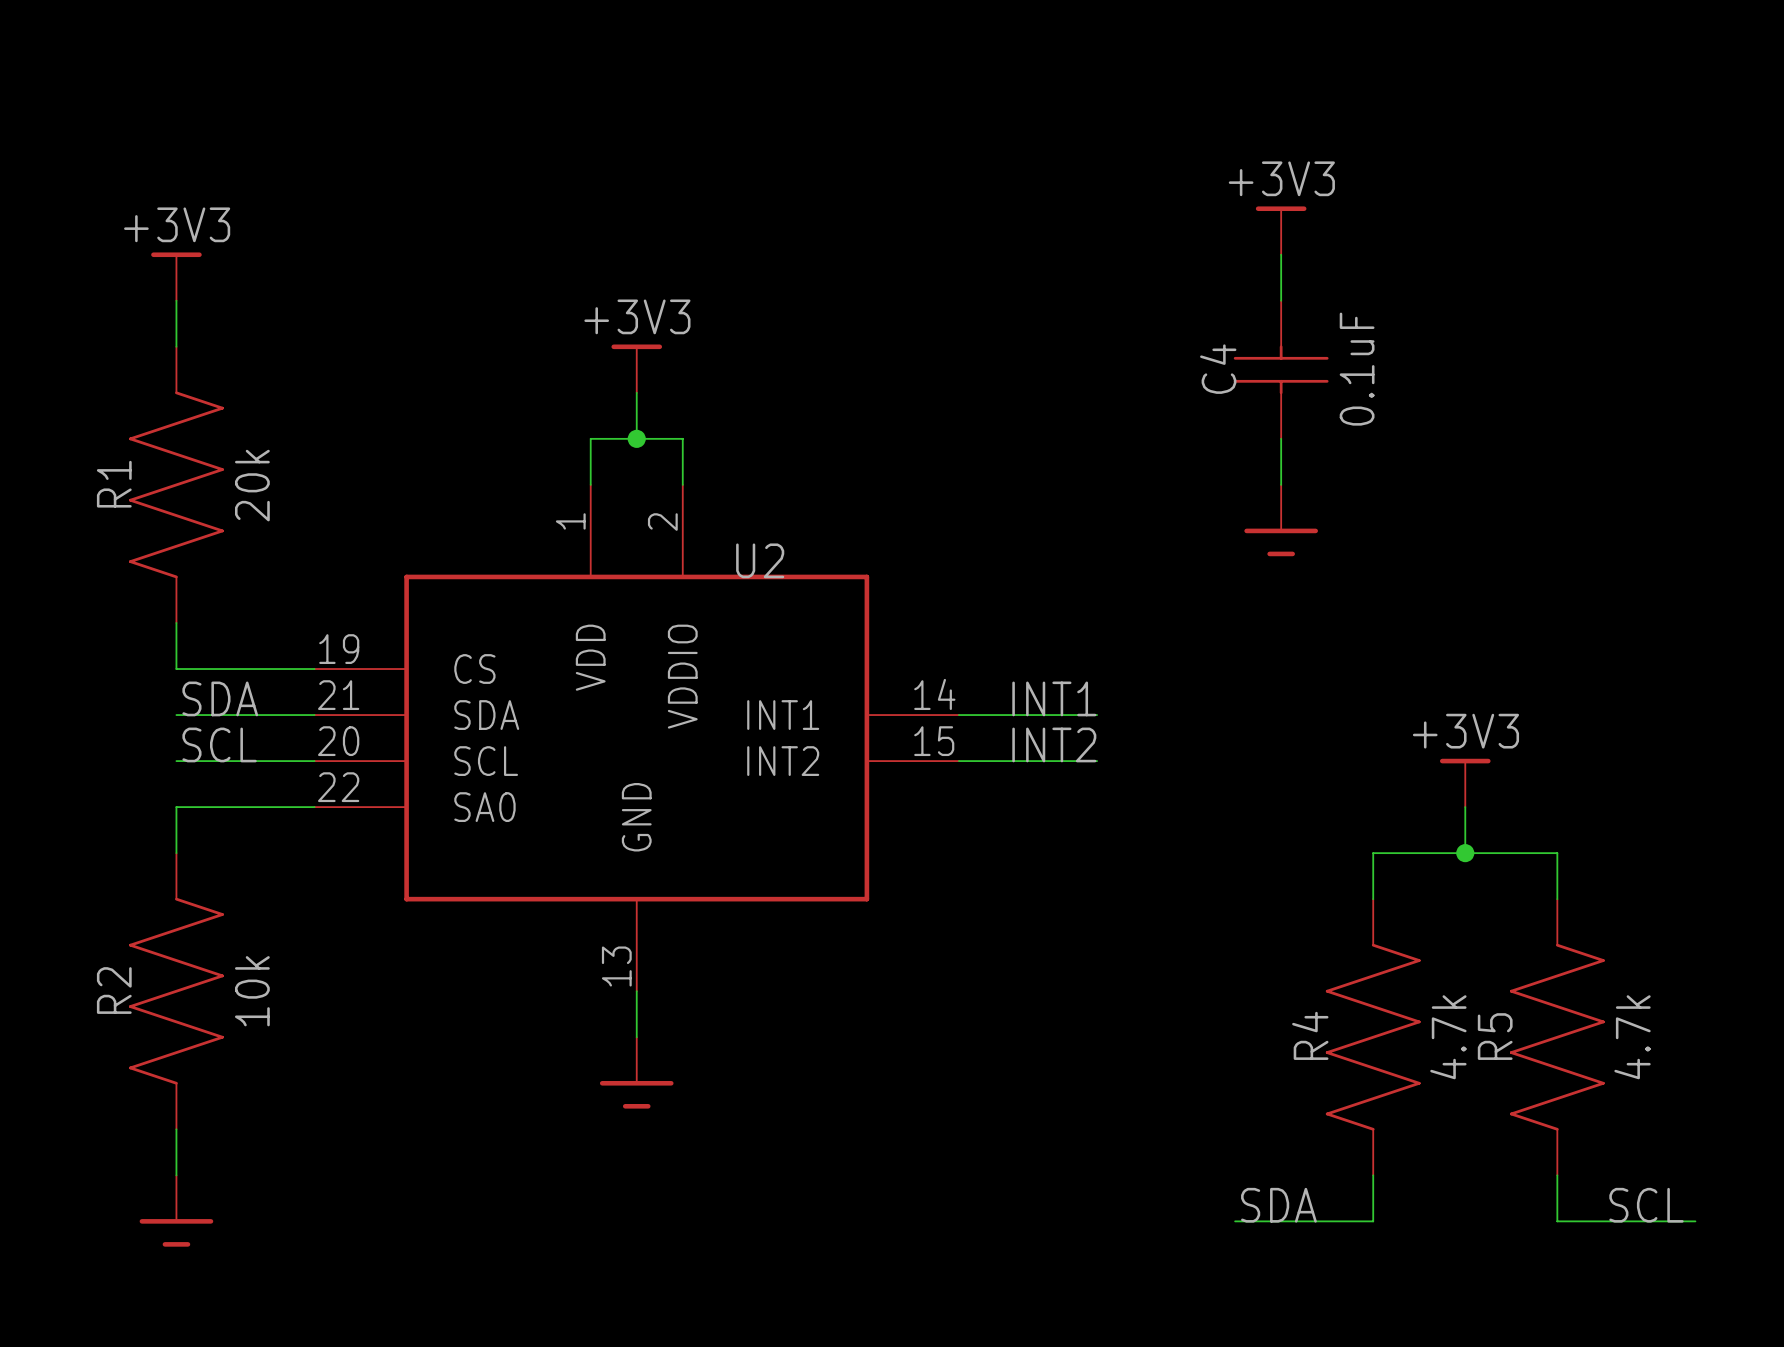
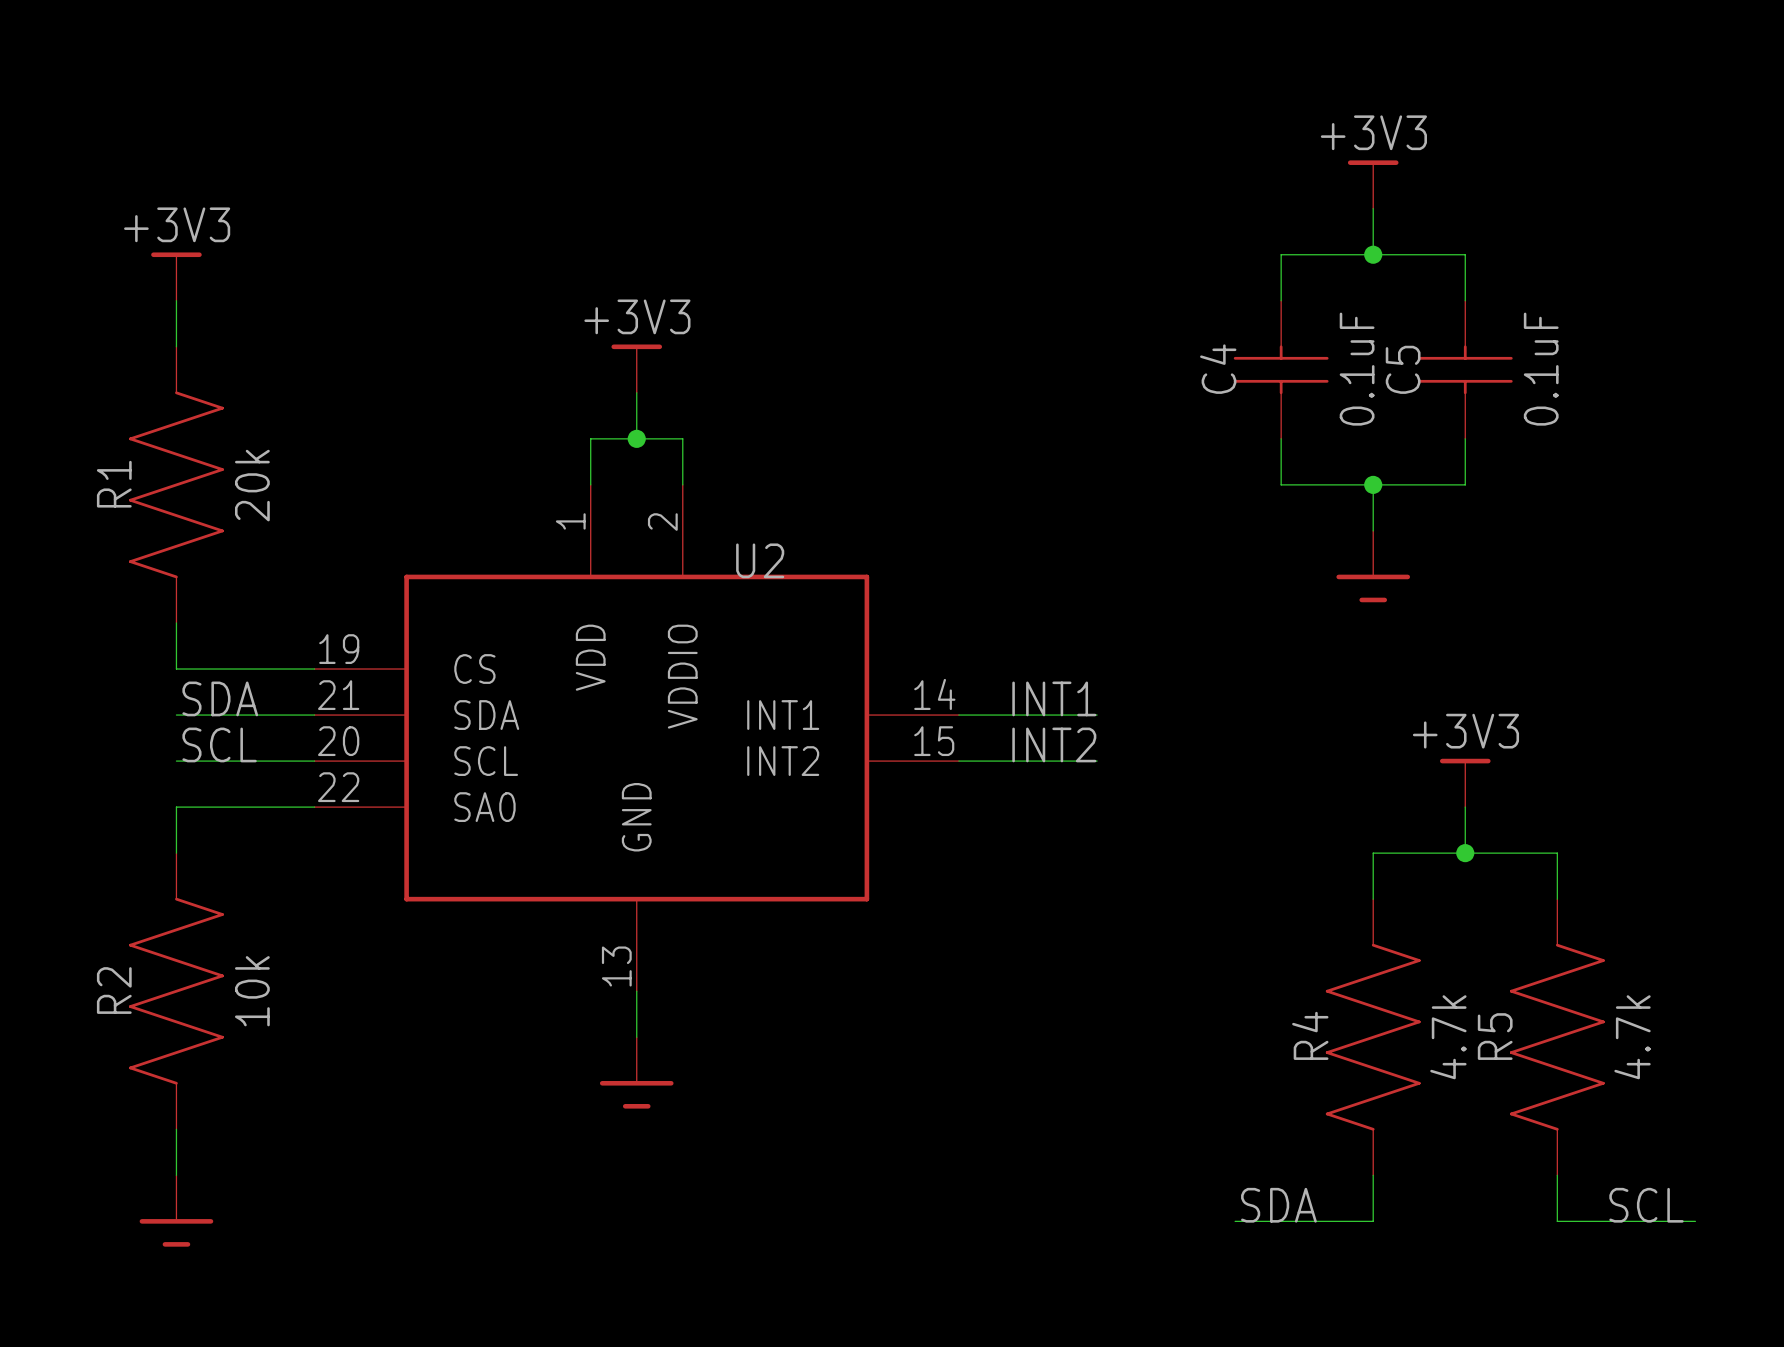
wire: none -> (1373, 208) (1373, 254)
power symbol position: +3V3 (1281, 230) -> +3V3 (1373, 184)
wire: none -> (1281, 254) (1465, 254) (1465, 300)
junction: none -> (1373, 254)
C5: none -> 0.1uF (1465, 369)
wire: none -> (1465, 438) (1465, 484) (1281, 484)
wire: none -> (1373, 484) (1373, 530)
junction: none -> (1373, 484)
power symbol position: (1281, 520) -> (1373, 566)

